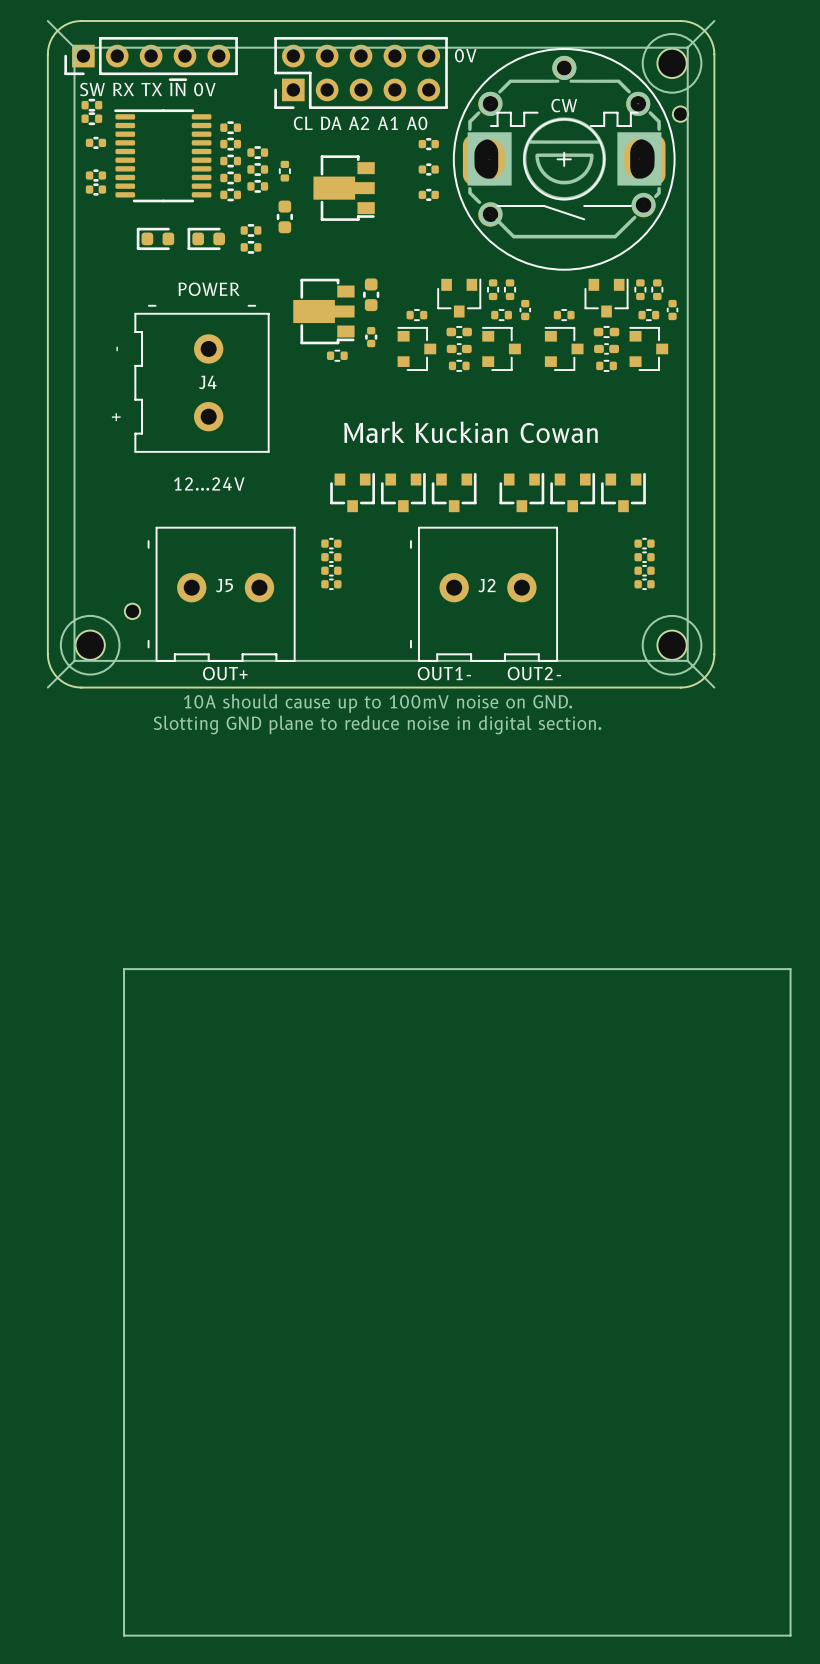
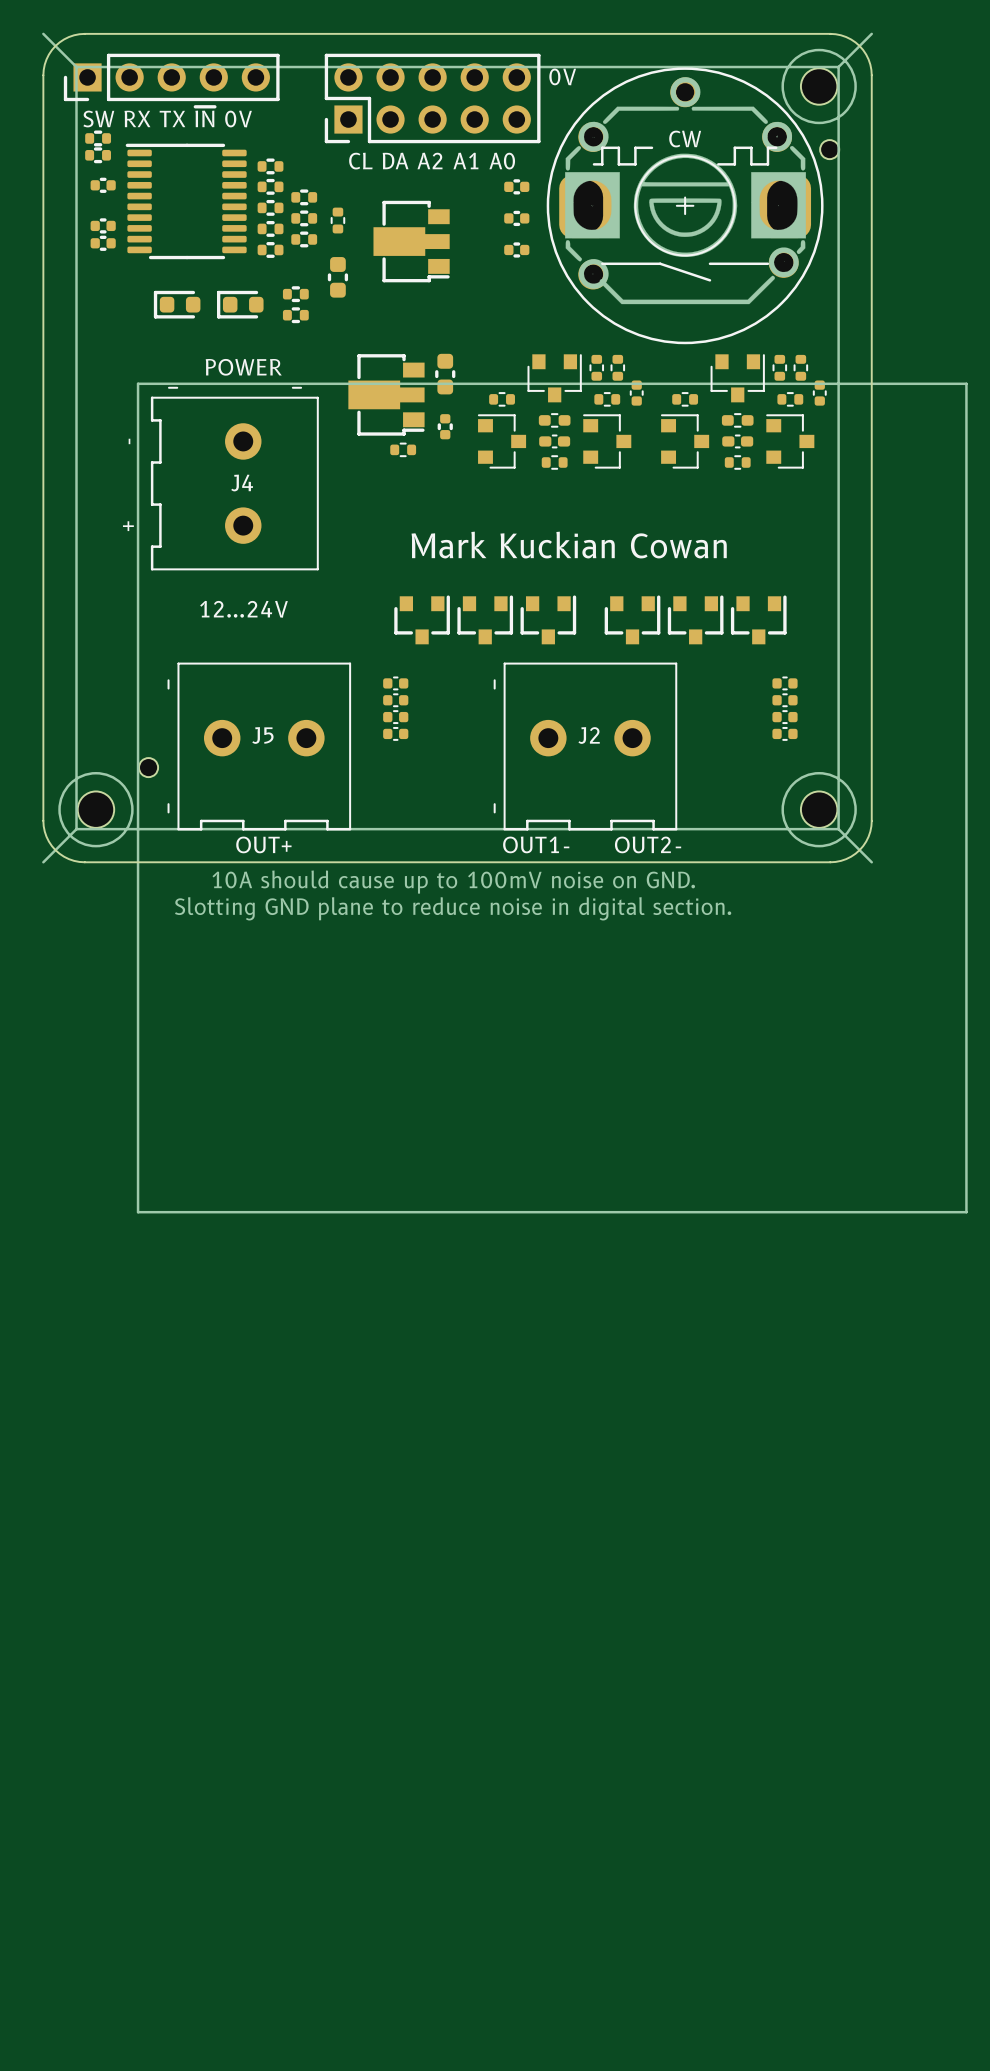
line: (124, 969) (124, 1635) (790, 1635) (790, 969) -> (138, 1212) (138, 383) (966, 383) (966, 1212)

